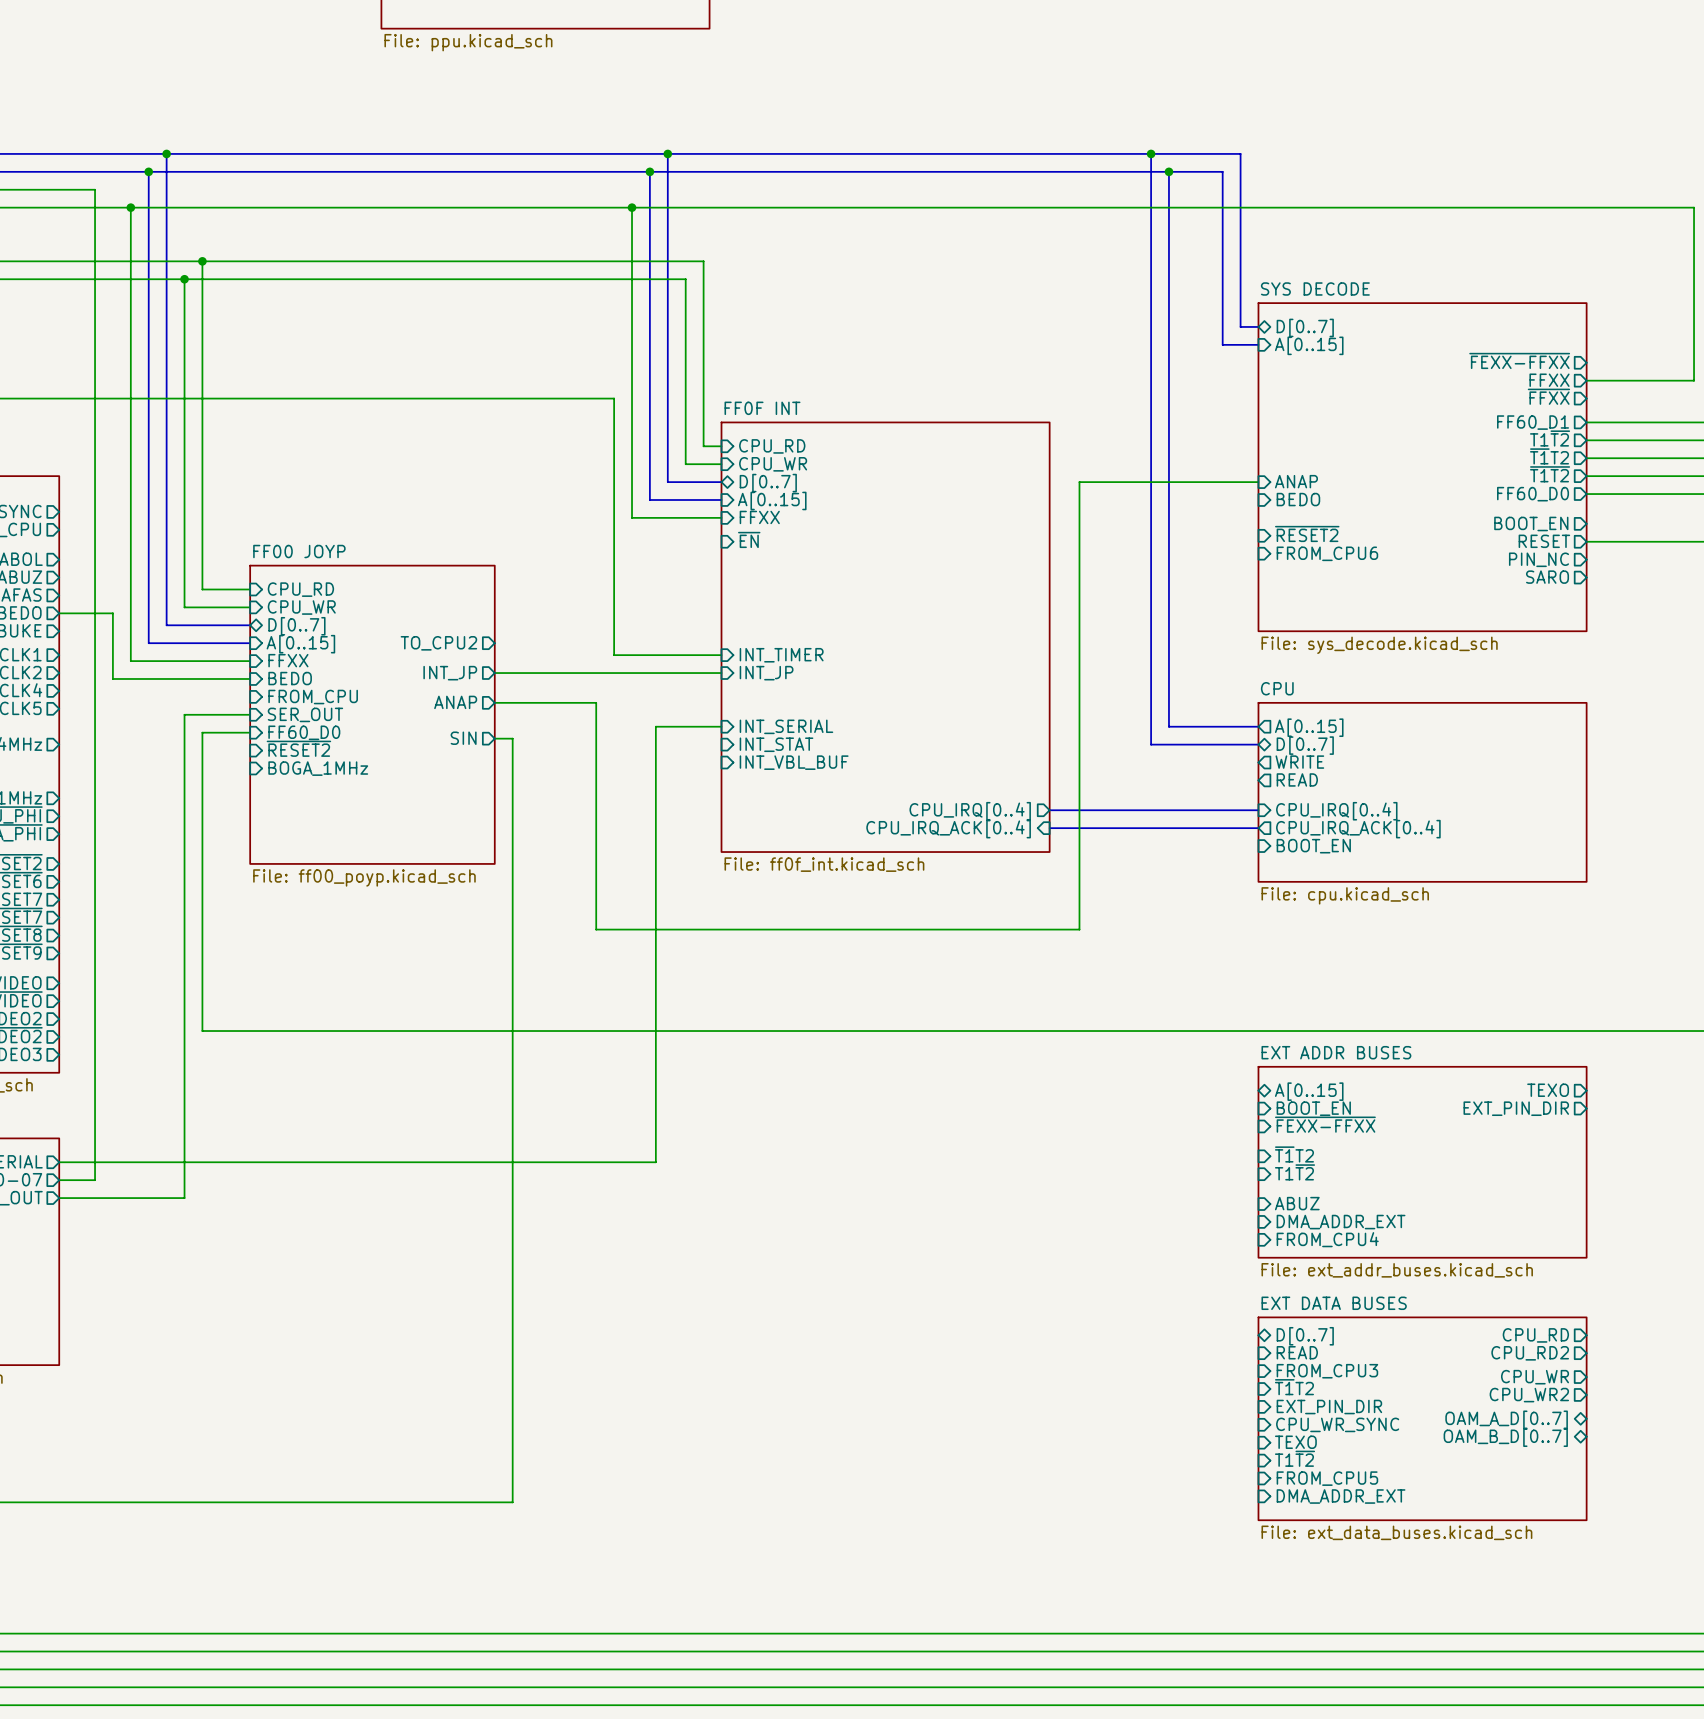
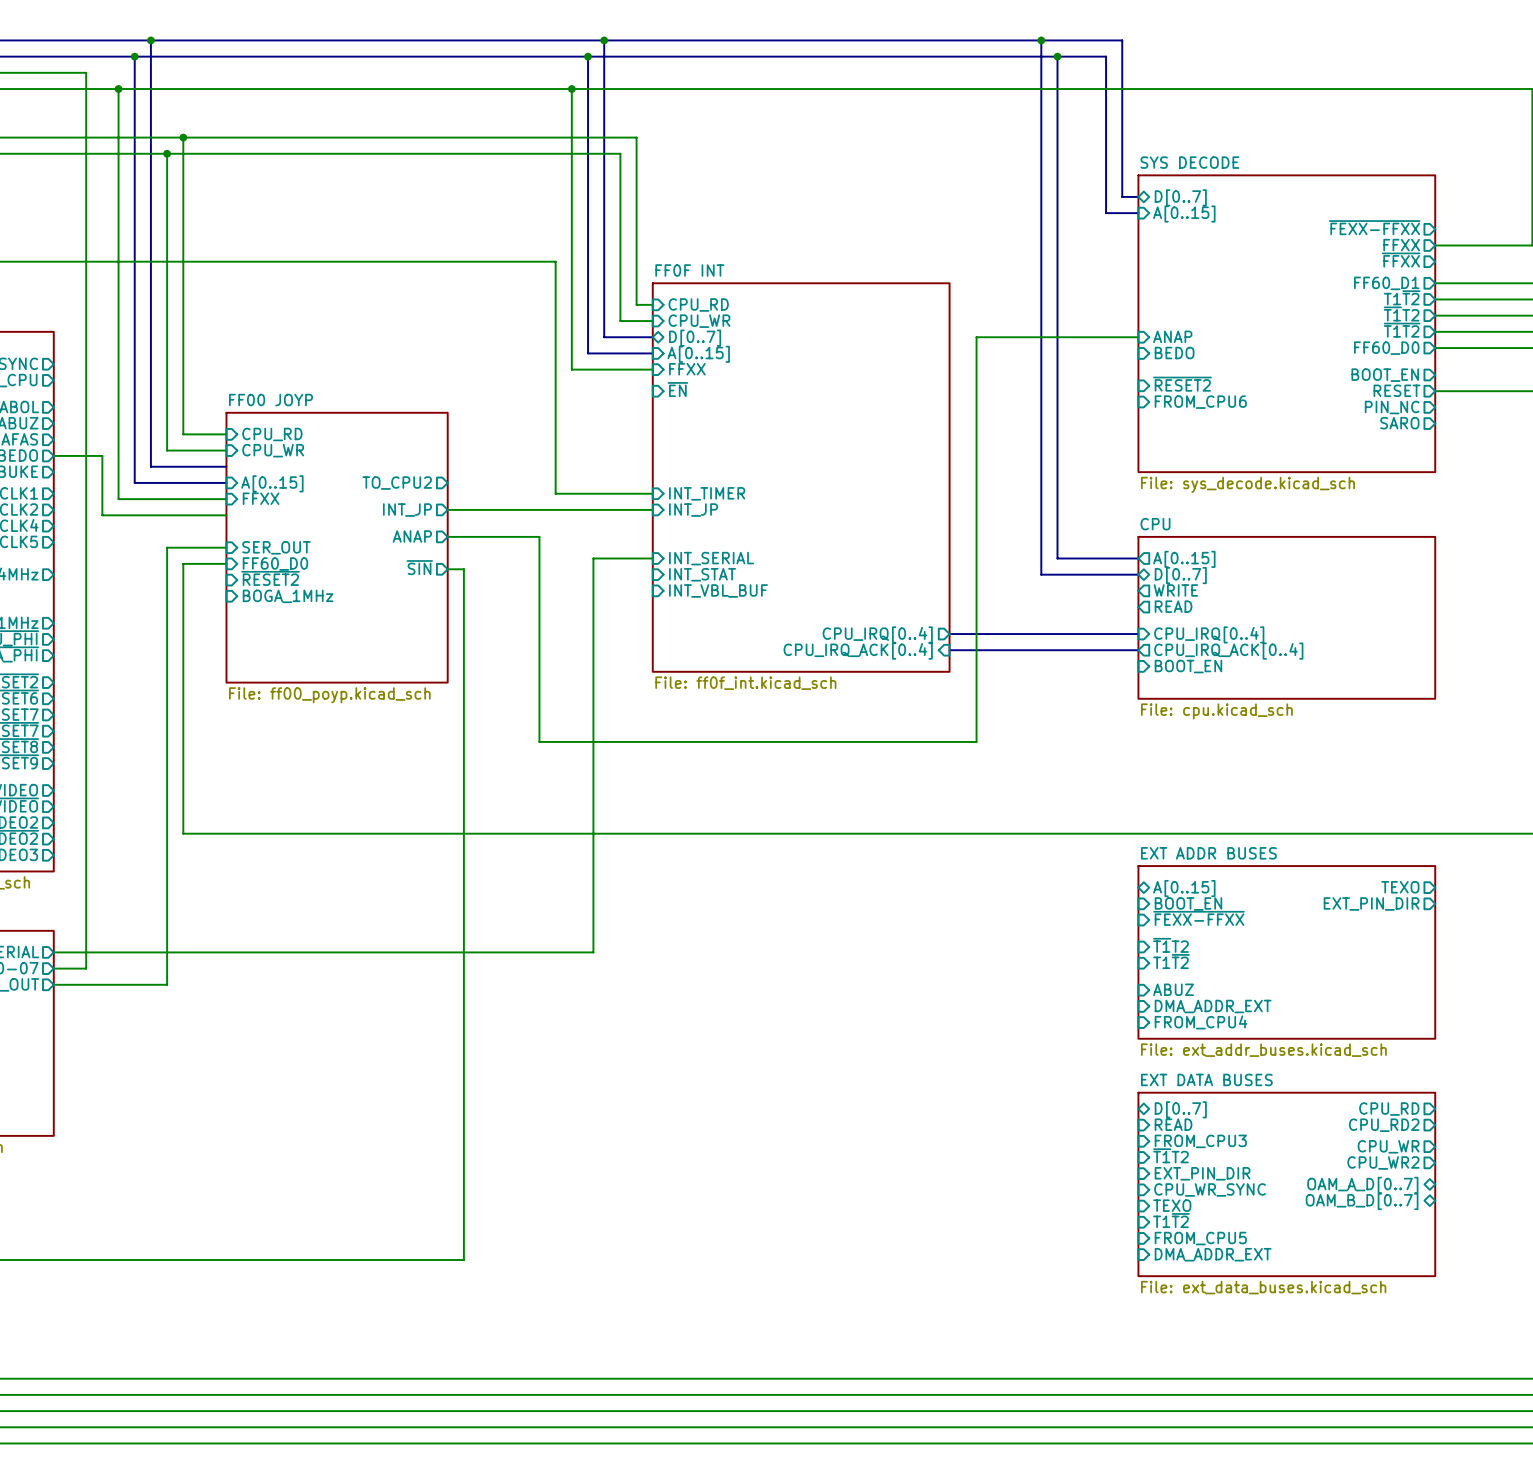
sheet pin: D[0..7] (296, 626) -> none
sheet pin: BEDO (290, 678) -> none
sheet pin: FROM_CPU (313, 697) -> none
sheet pin: SIN (463, 738) -> ~{SIN} (419, 567)

